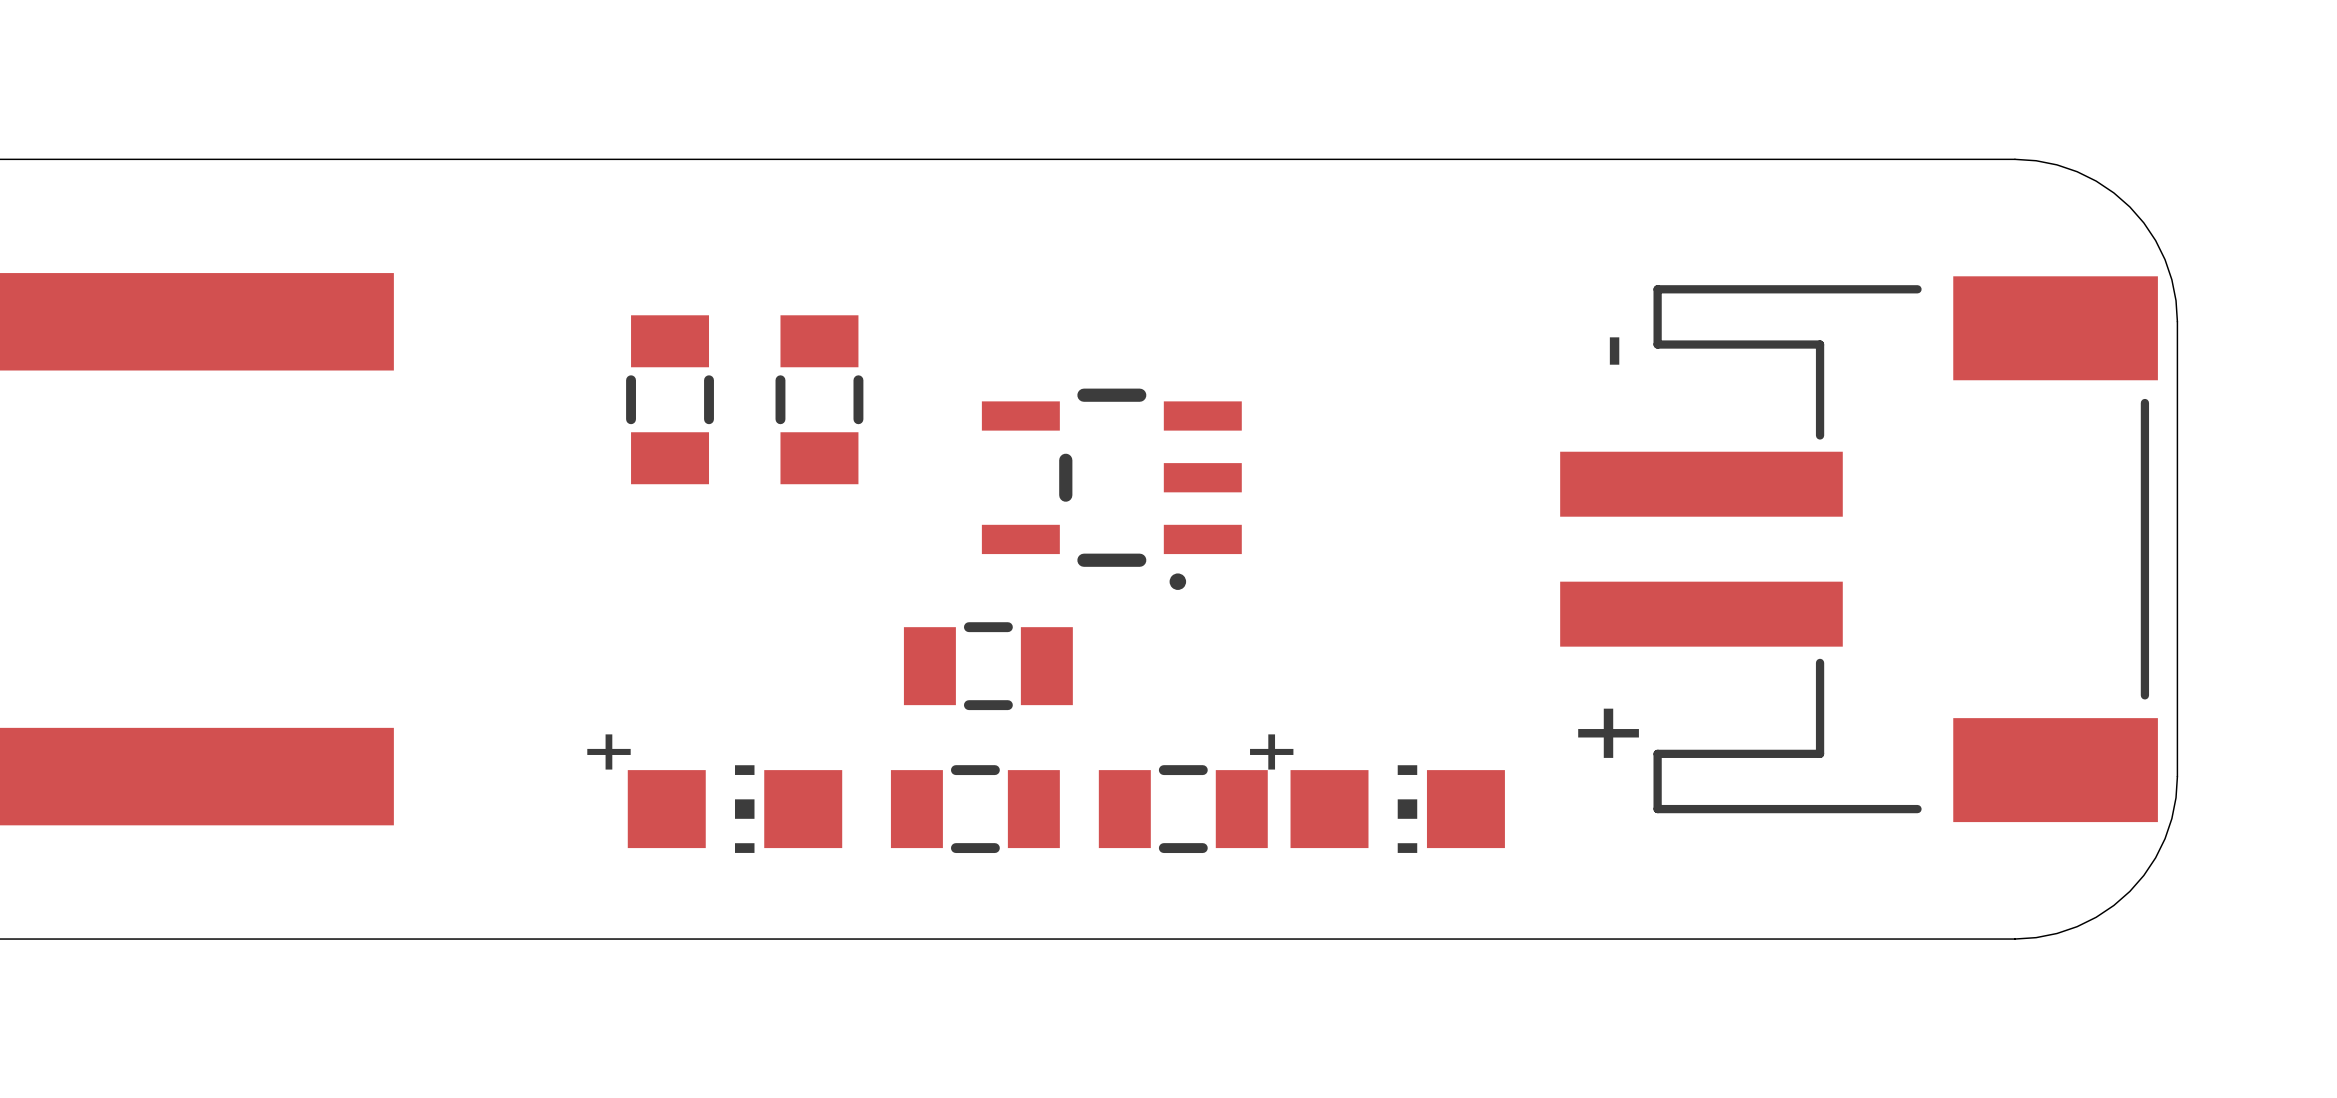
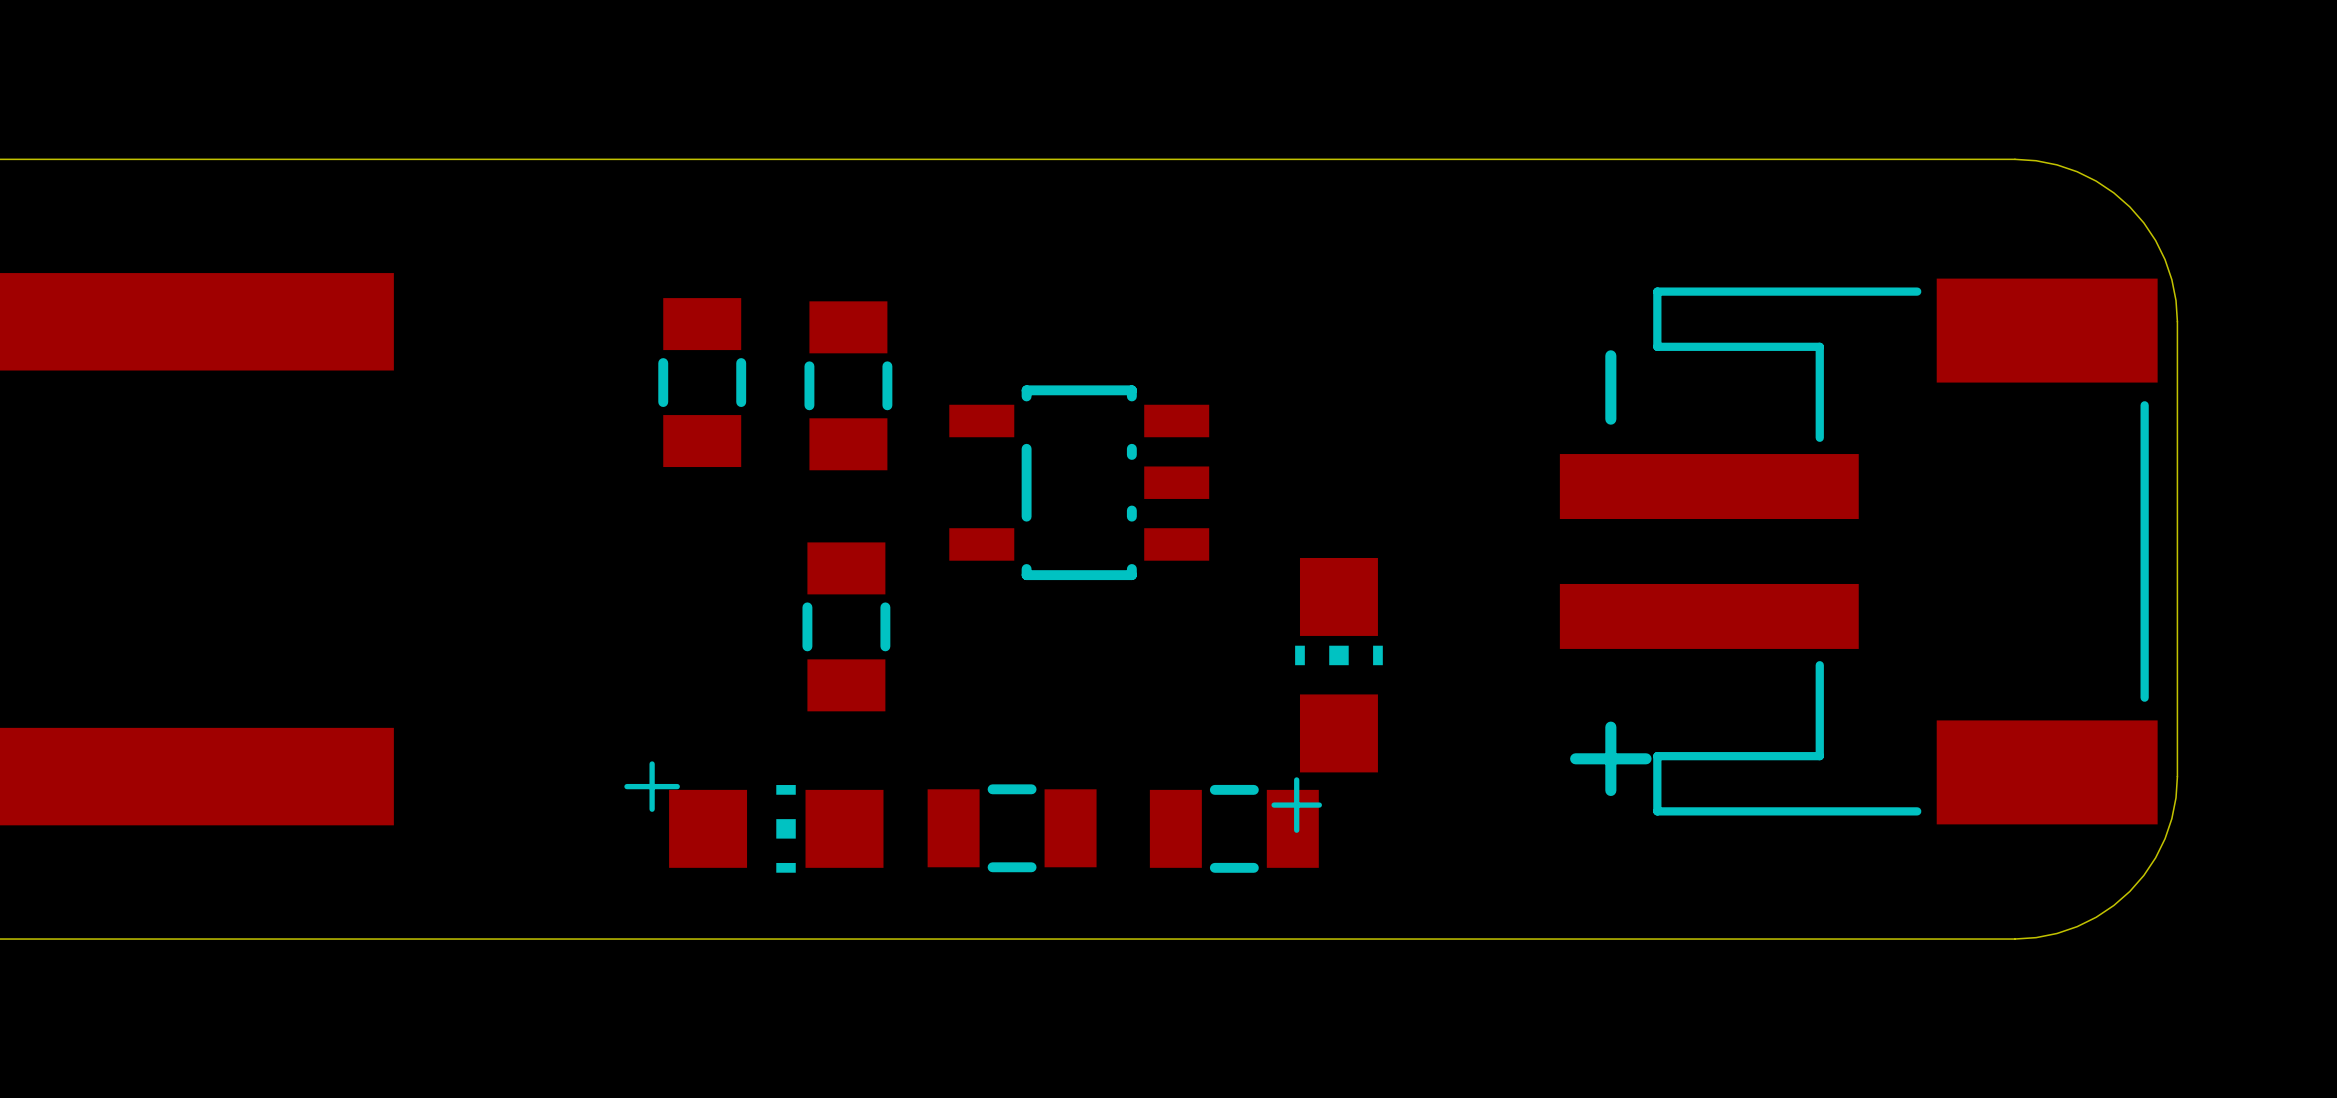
part footprint: [1560, 276, 2158, 823] -> [1559, 278, 2158, 825]
part footprint: [981, 388, 1242, 590] -> [949, 385, 1210, 581]
part position: (670, 399) -> (702, 382)
part position: (819, 399) -> (848, 385)
part: none -> (1338, 665)
part rotation: 0° (988, 666) -> 90° clockwise (846, 626)
part position: (988, 666) -> (846, 626)
part position: (734, 809) -> (776, 828)
part position: (975, 809) -> (1012, 828)
part position: (1183, 809) -> (1234, 828)
part: (1397, 809) -> none

